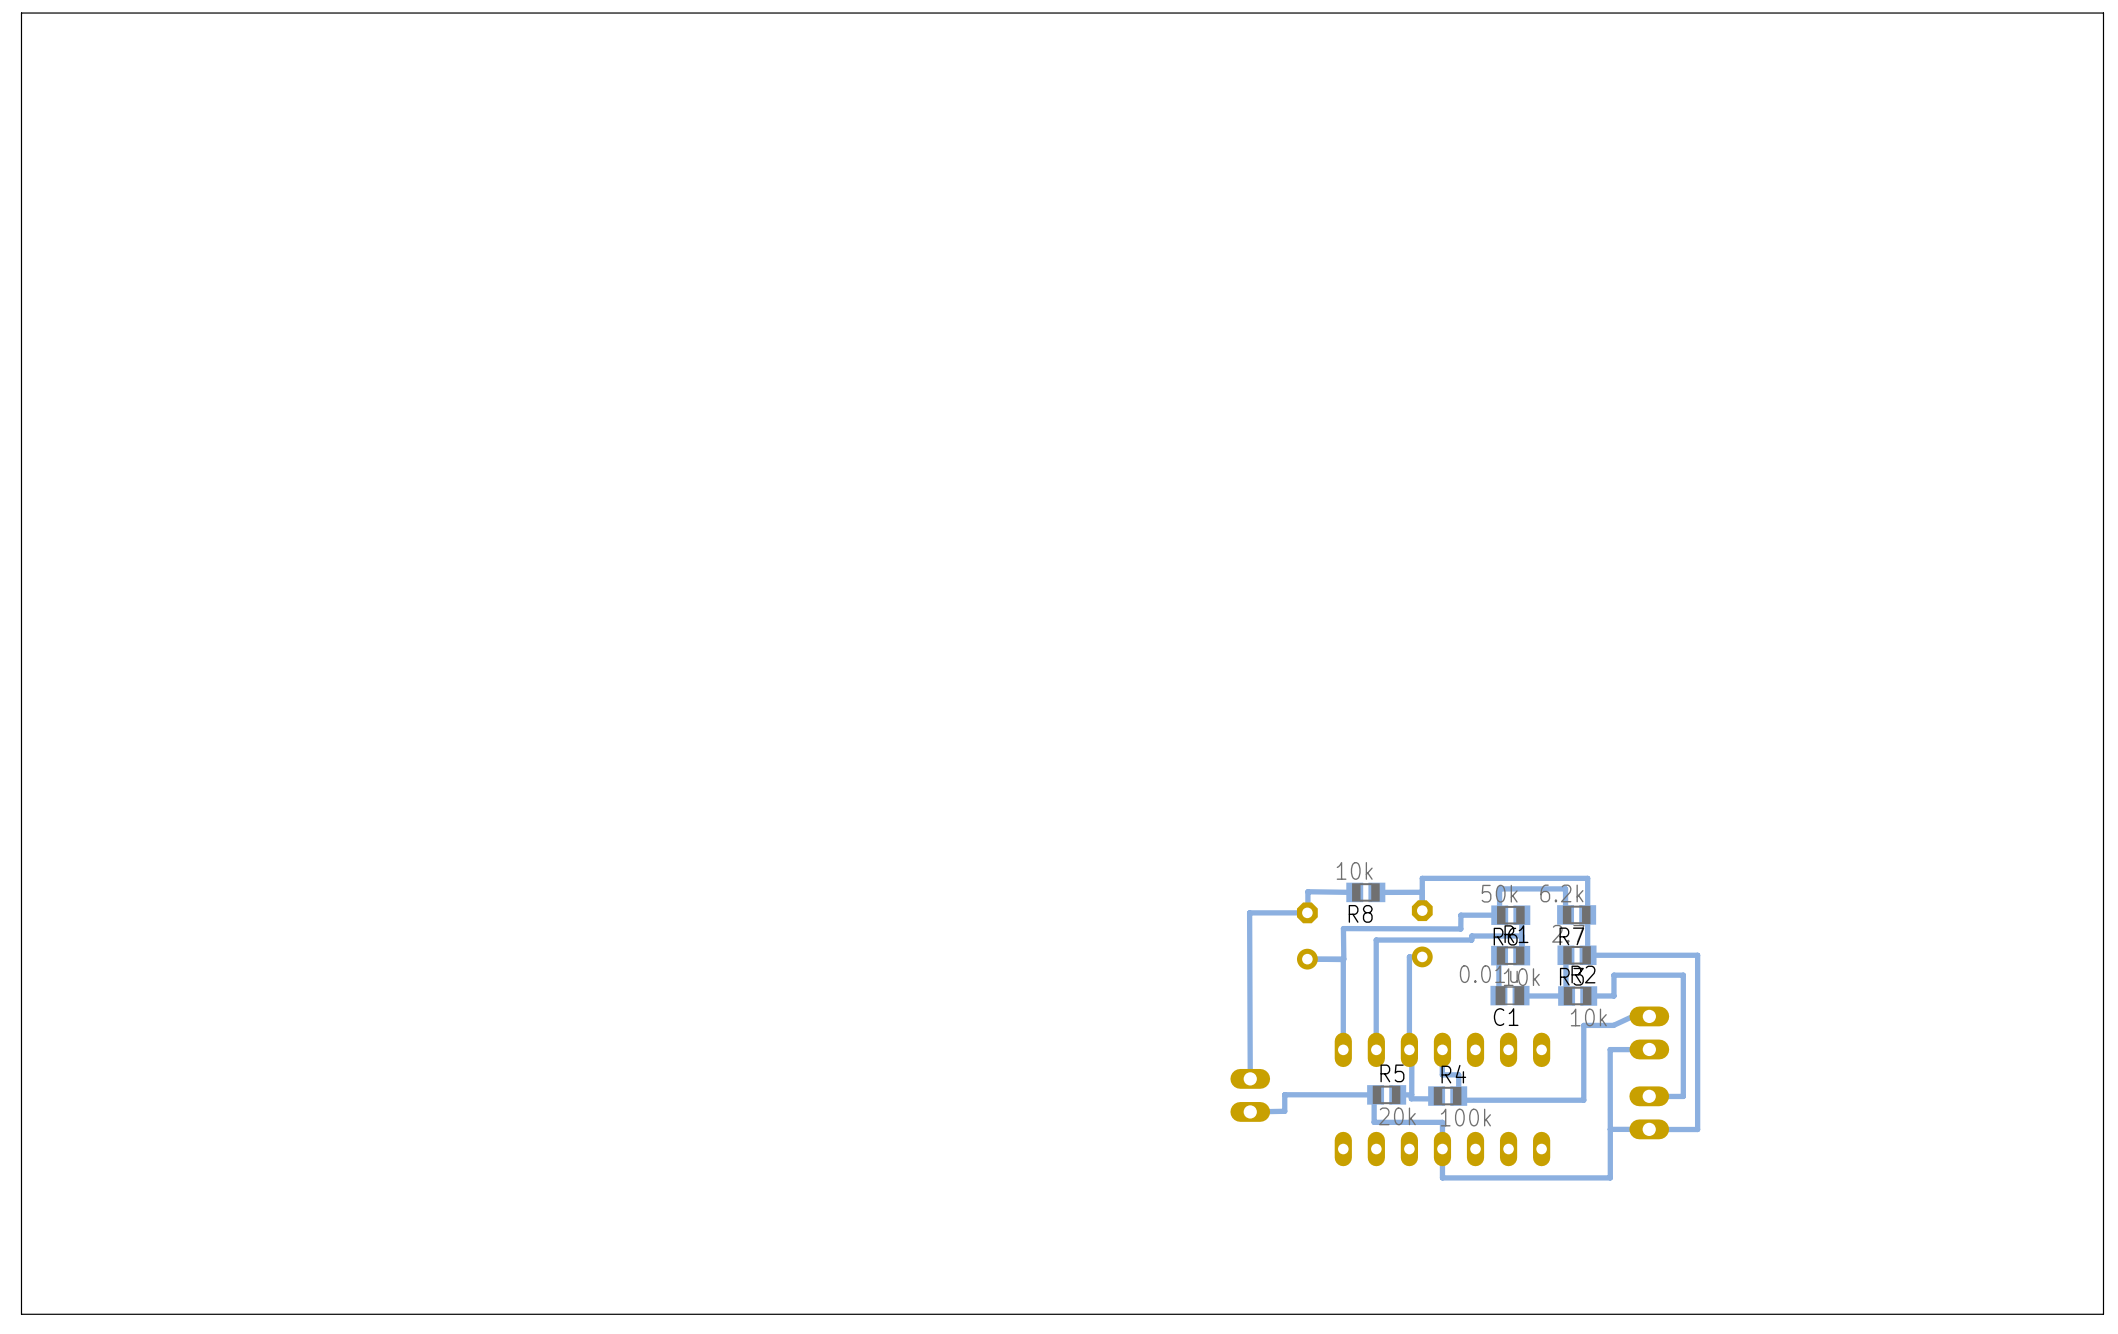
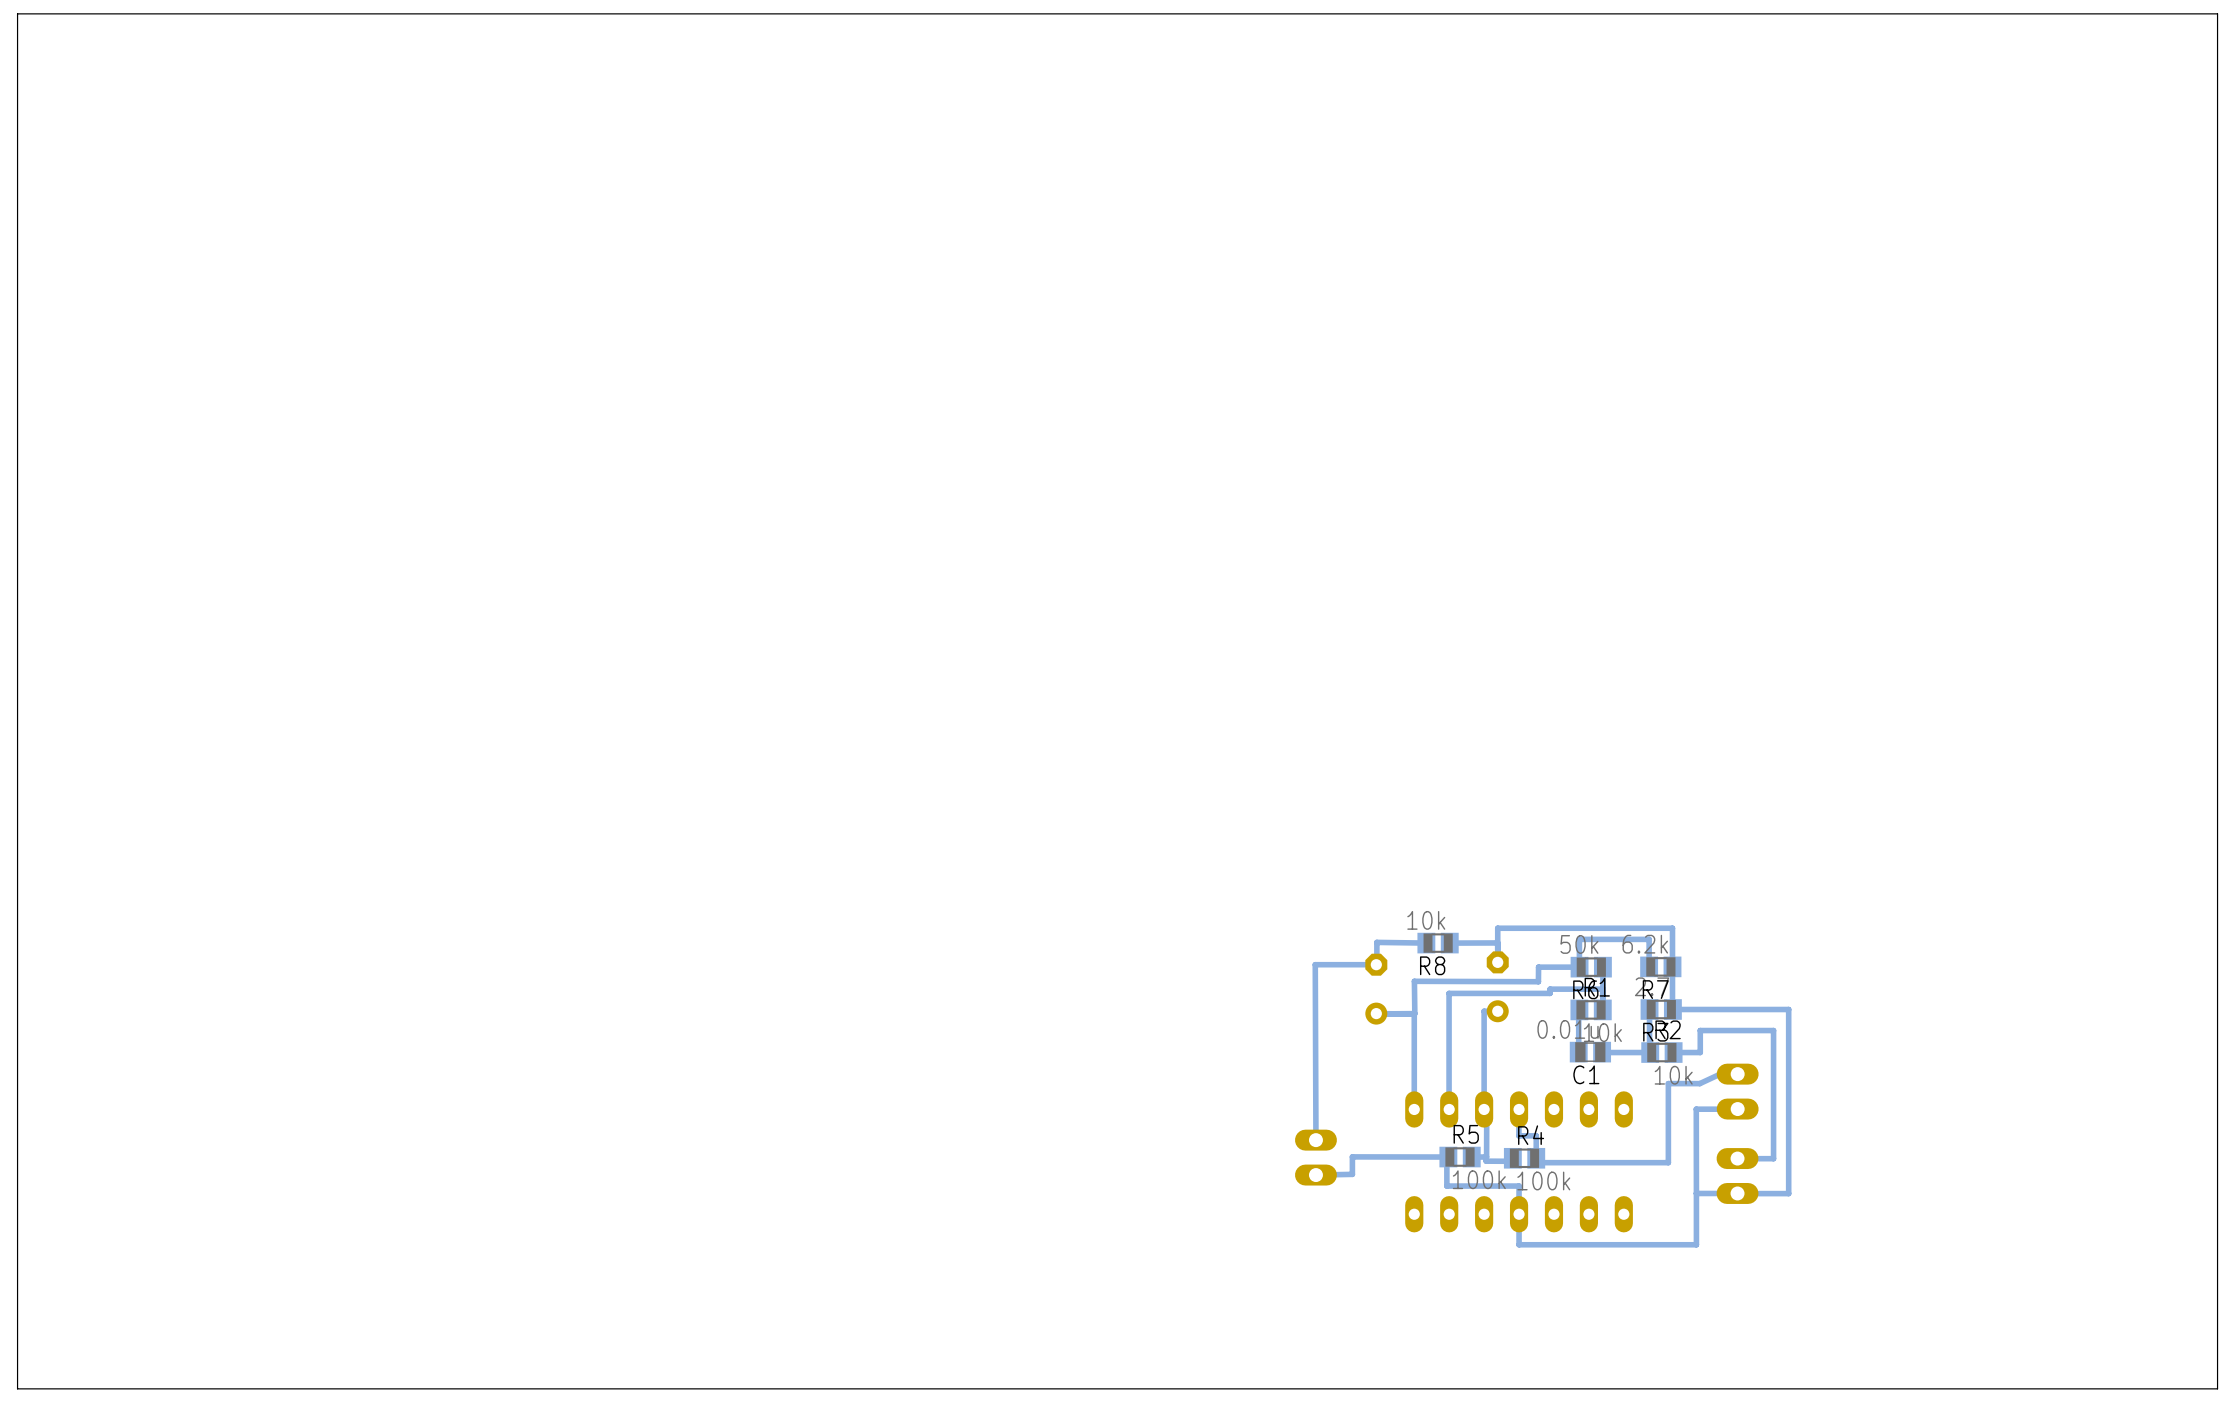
R5 value: 20k (1397, 1116) -> 100k (1479, 1179)

